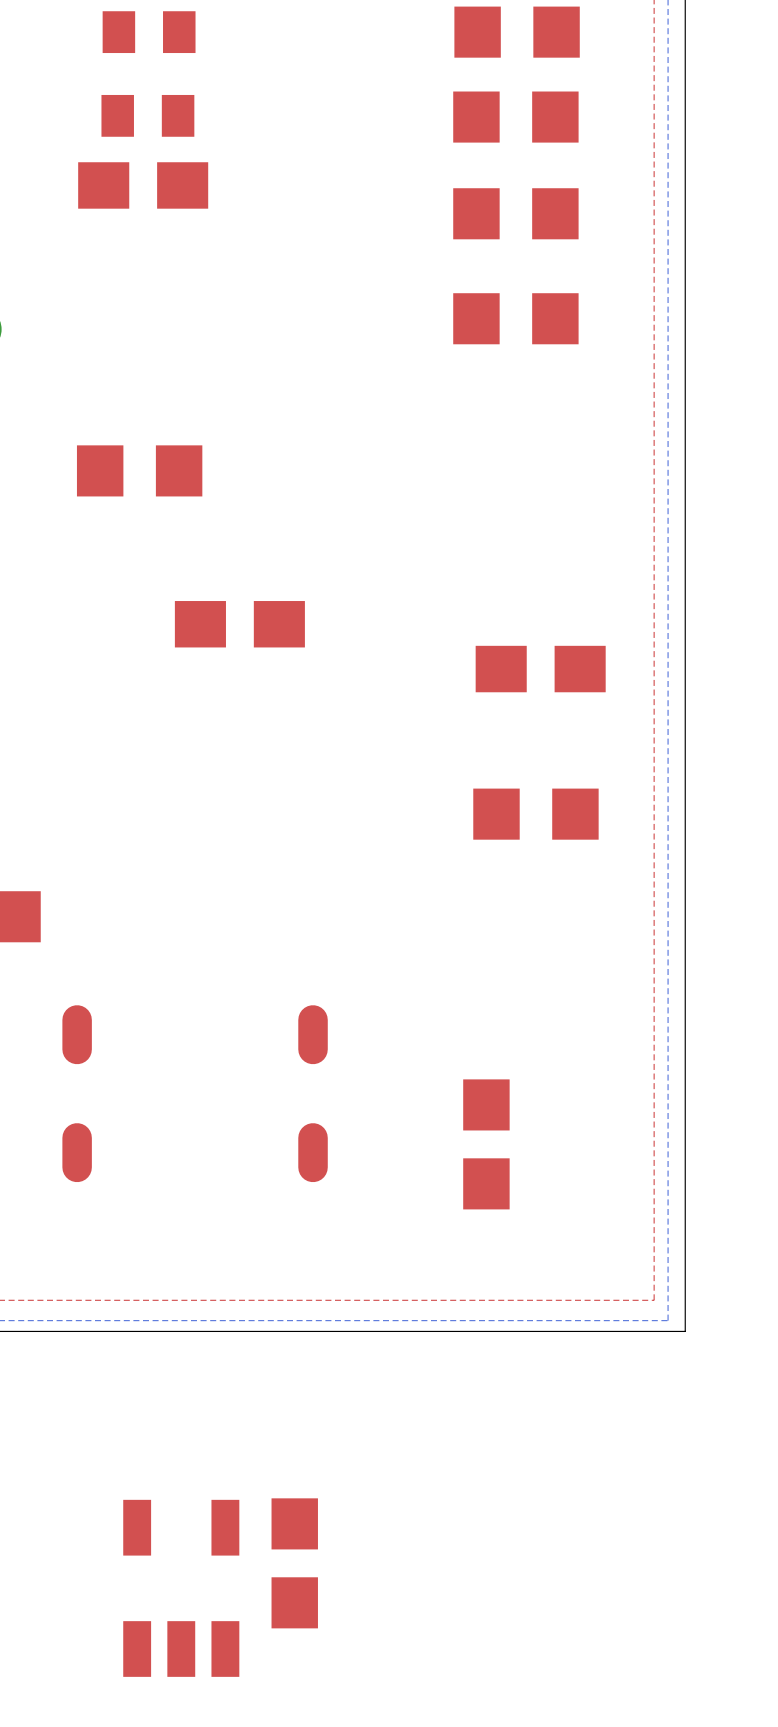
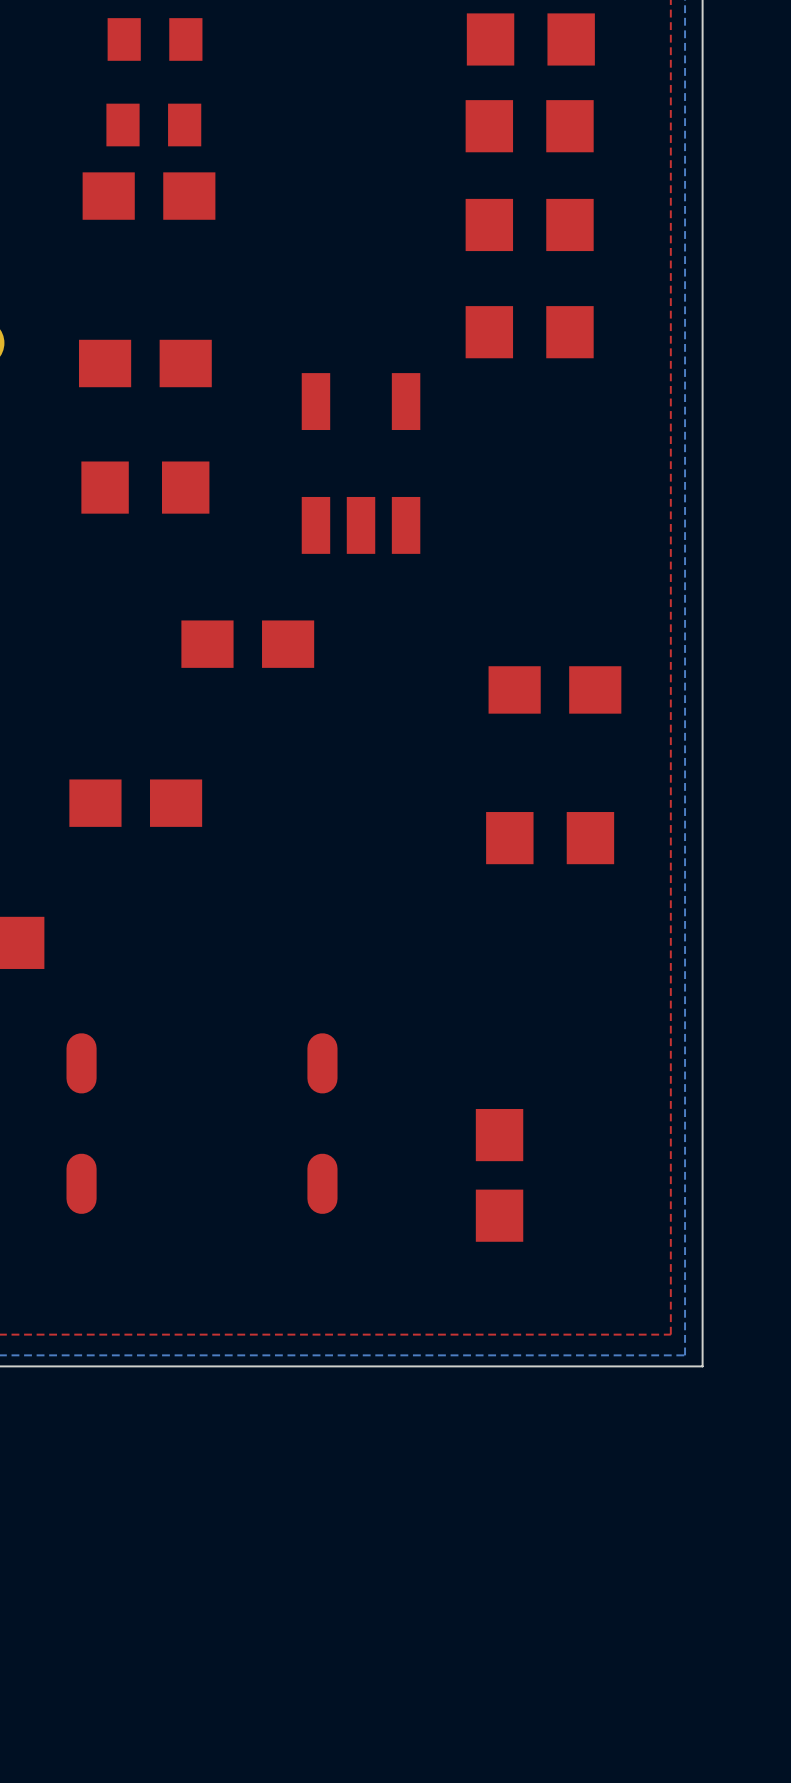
part: none -> (145, 363)
part: none -> (135, 803)
part: (294, 1563) -> none
part position: (181, 1588) -> (361, 463)

